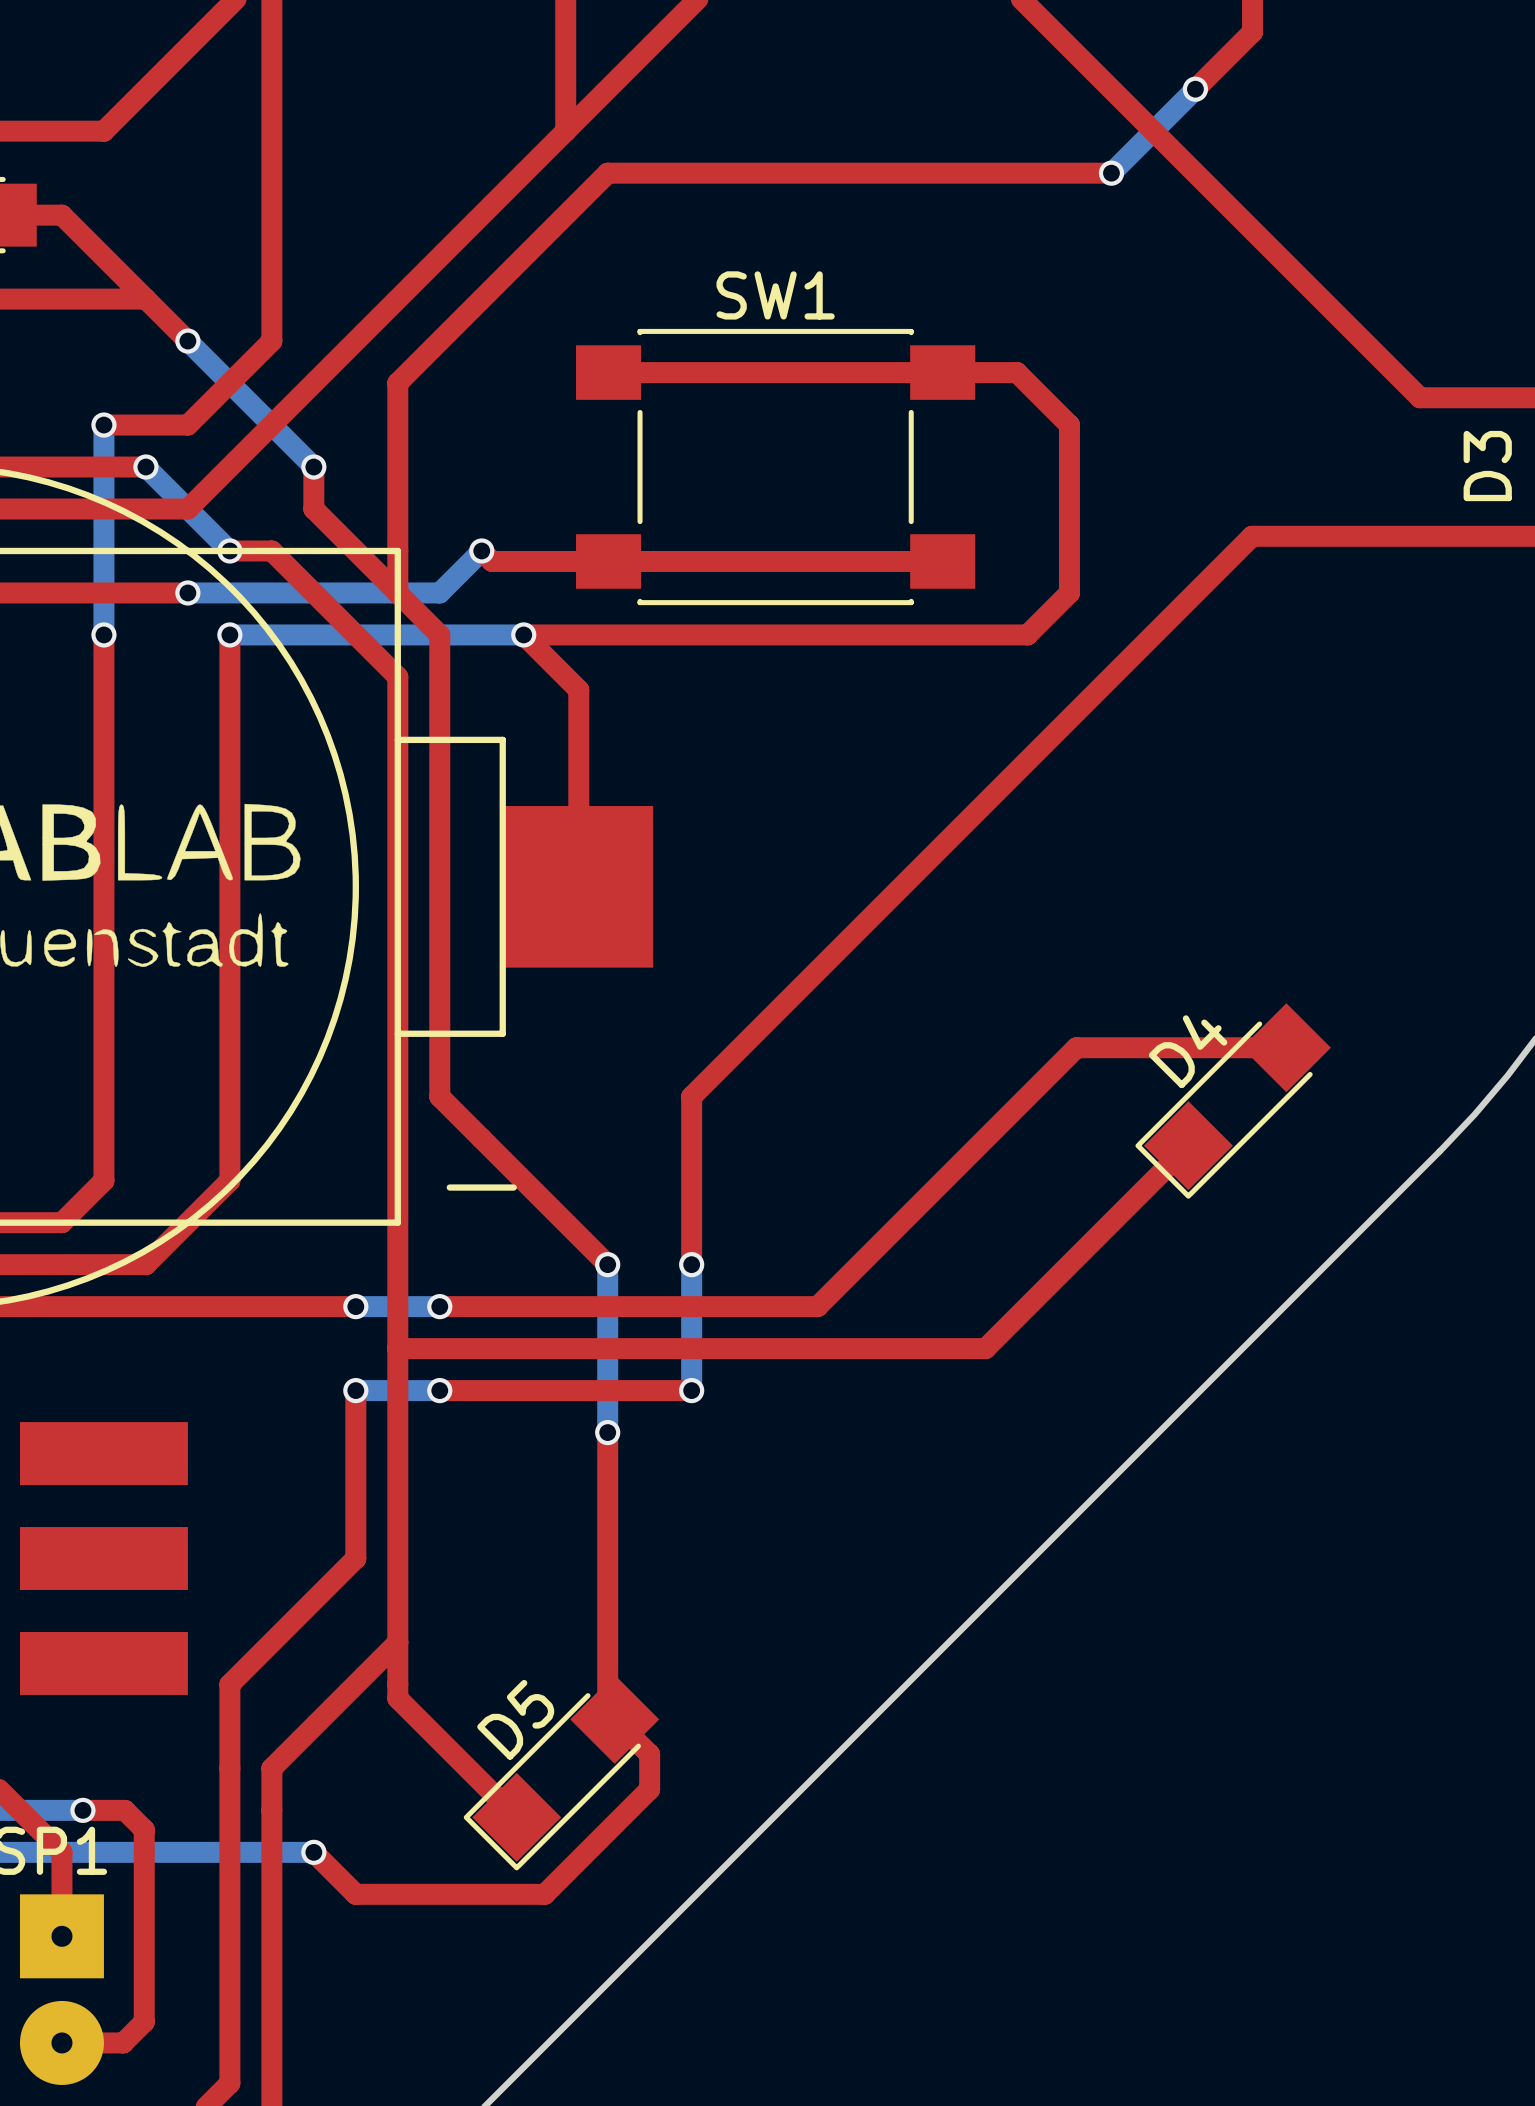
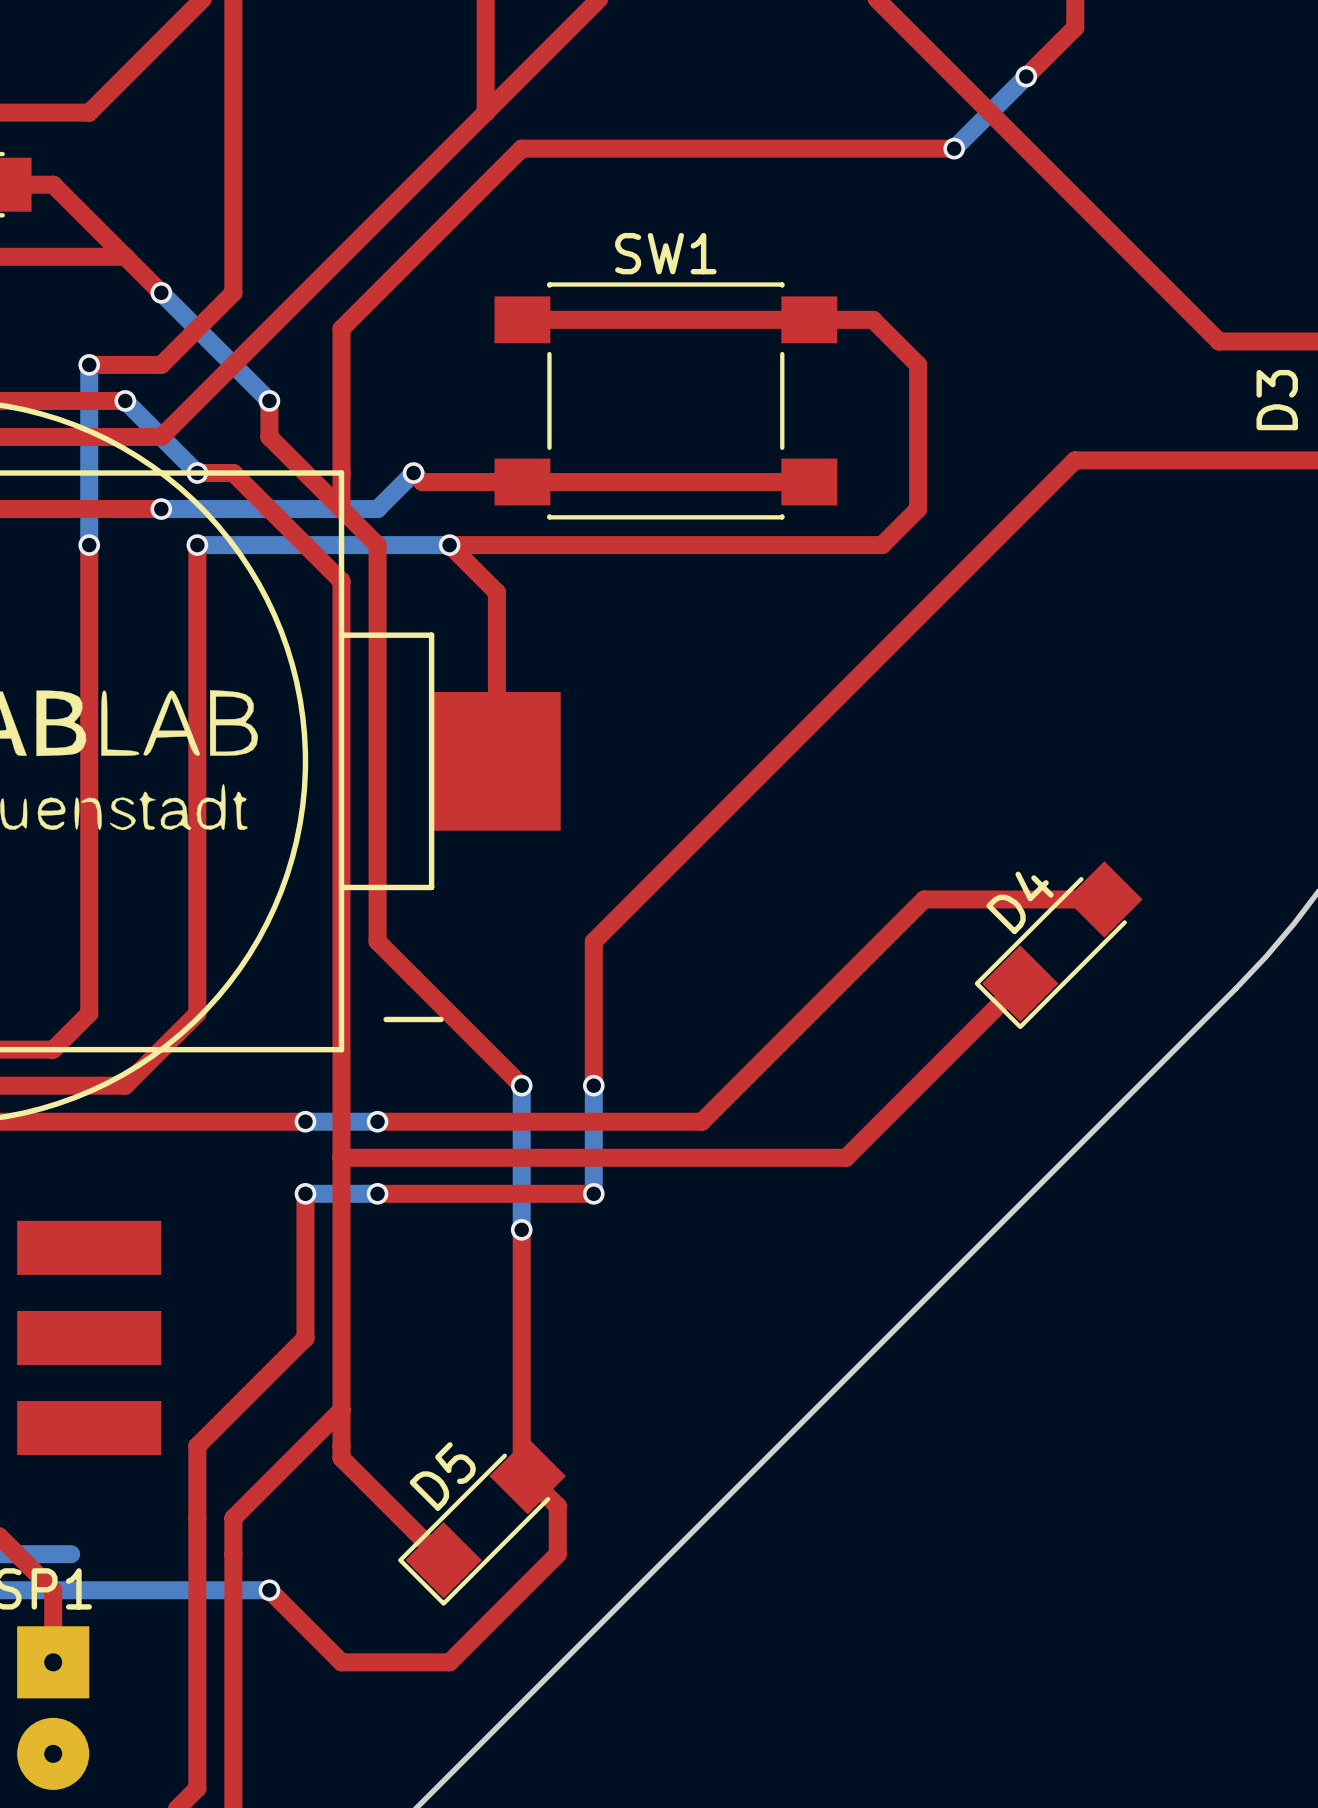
top track: (649, 1789) (544, 1894) (355, 1894) -> (557, 1536) (557, 1554) (449, 1662) (341, 1662) (305, 1626)
top track: (82, 1810) (124, 1810) (144, 1829) (144, 2021) (123, 2042) (61, 2042) -> none
via: (82, 1810) -> none

